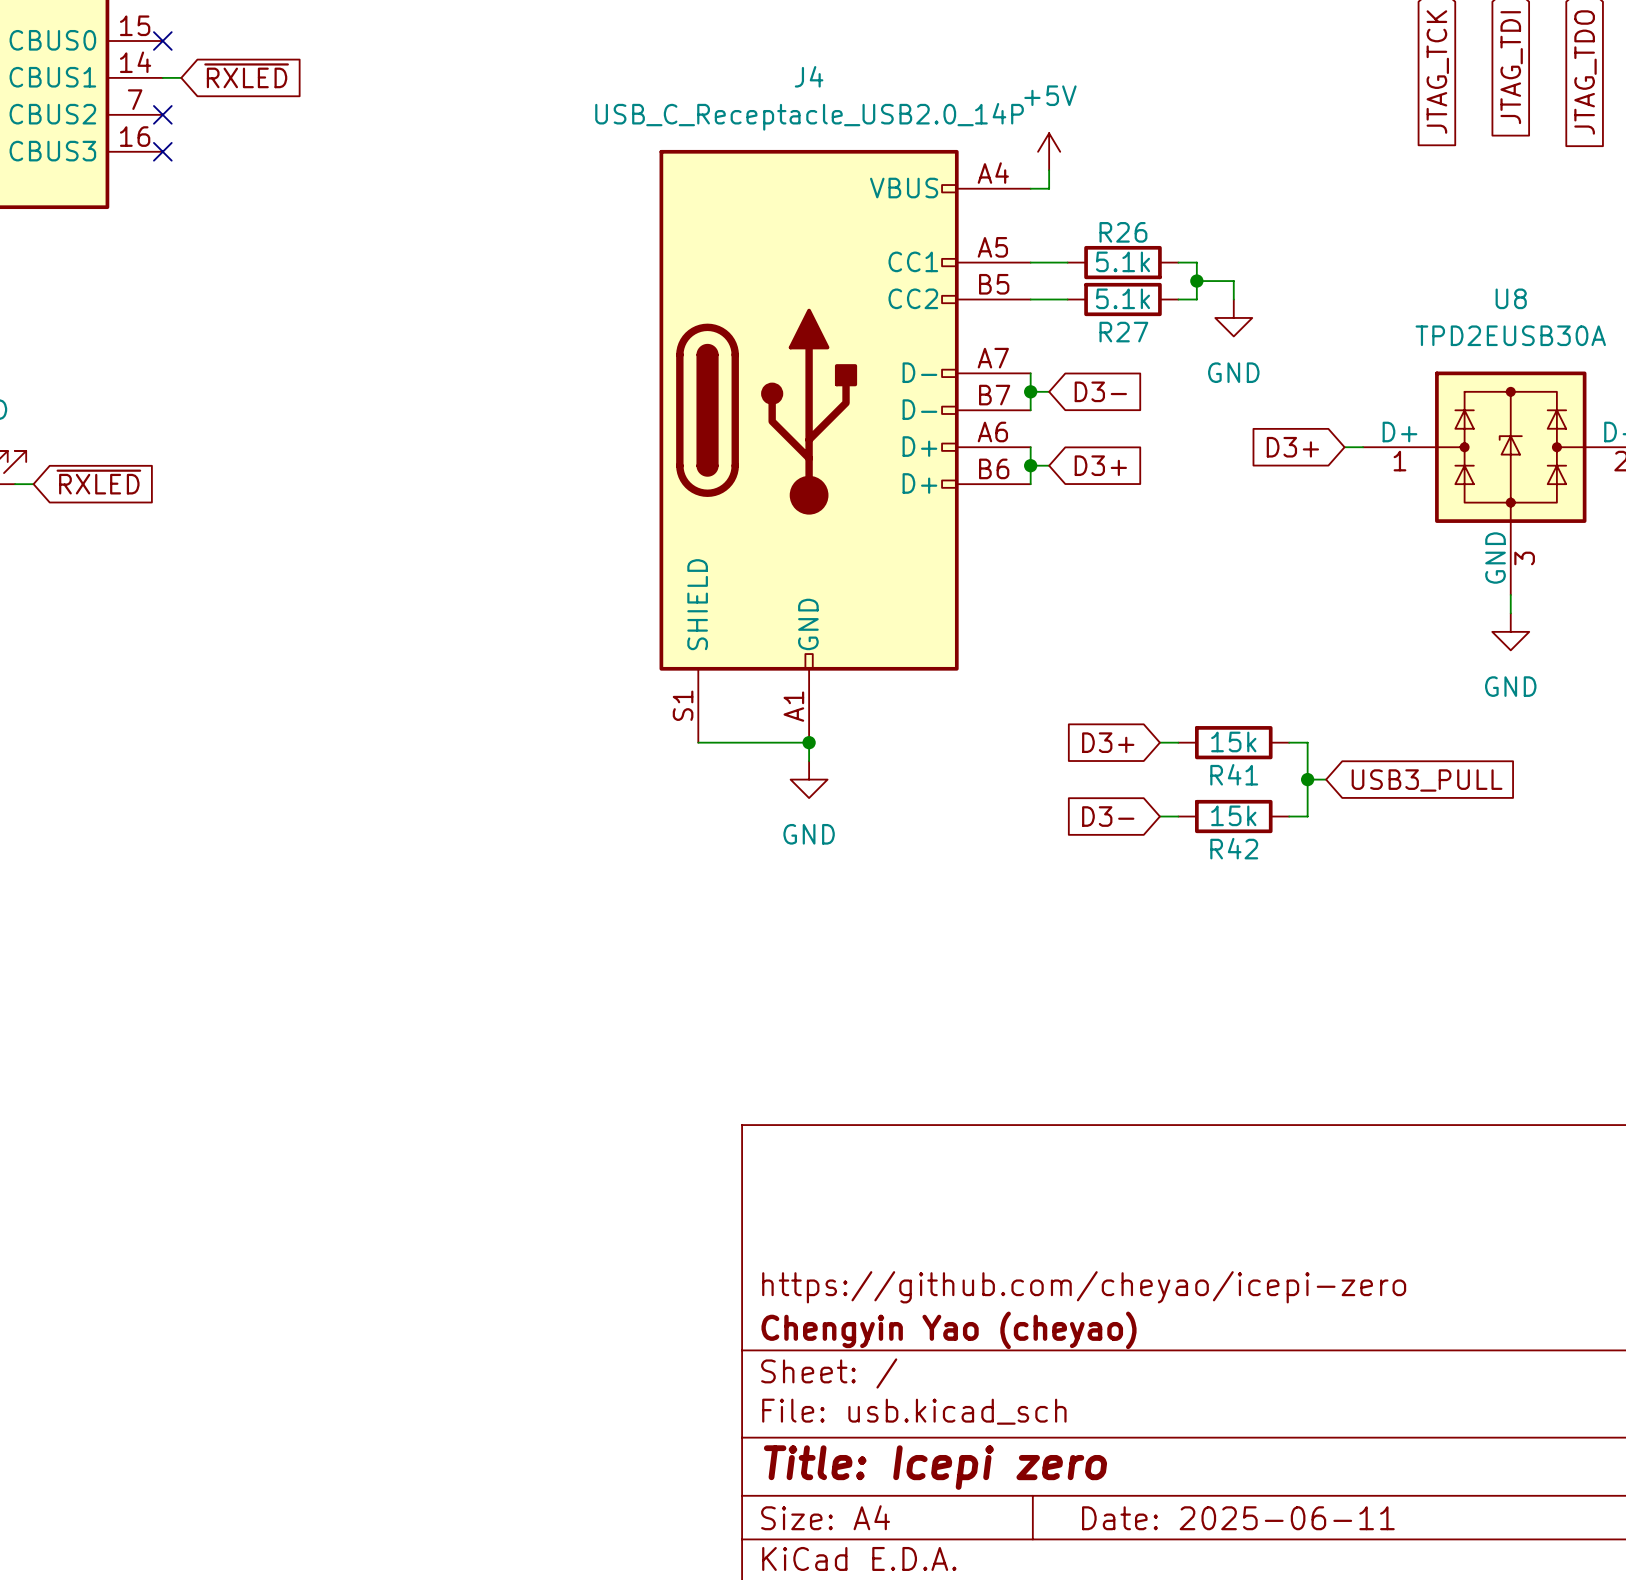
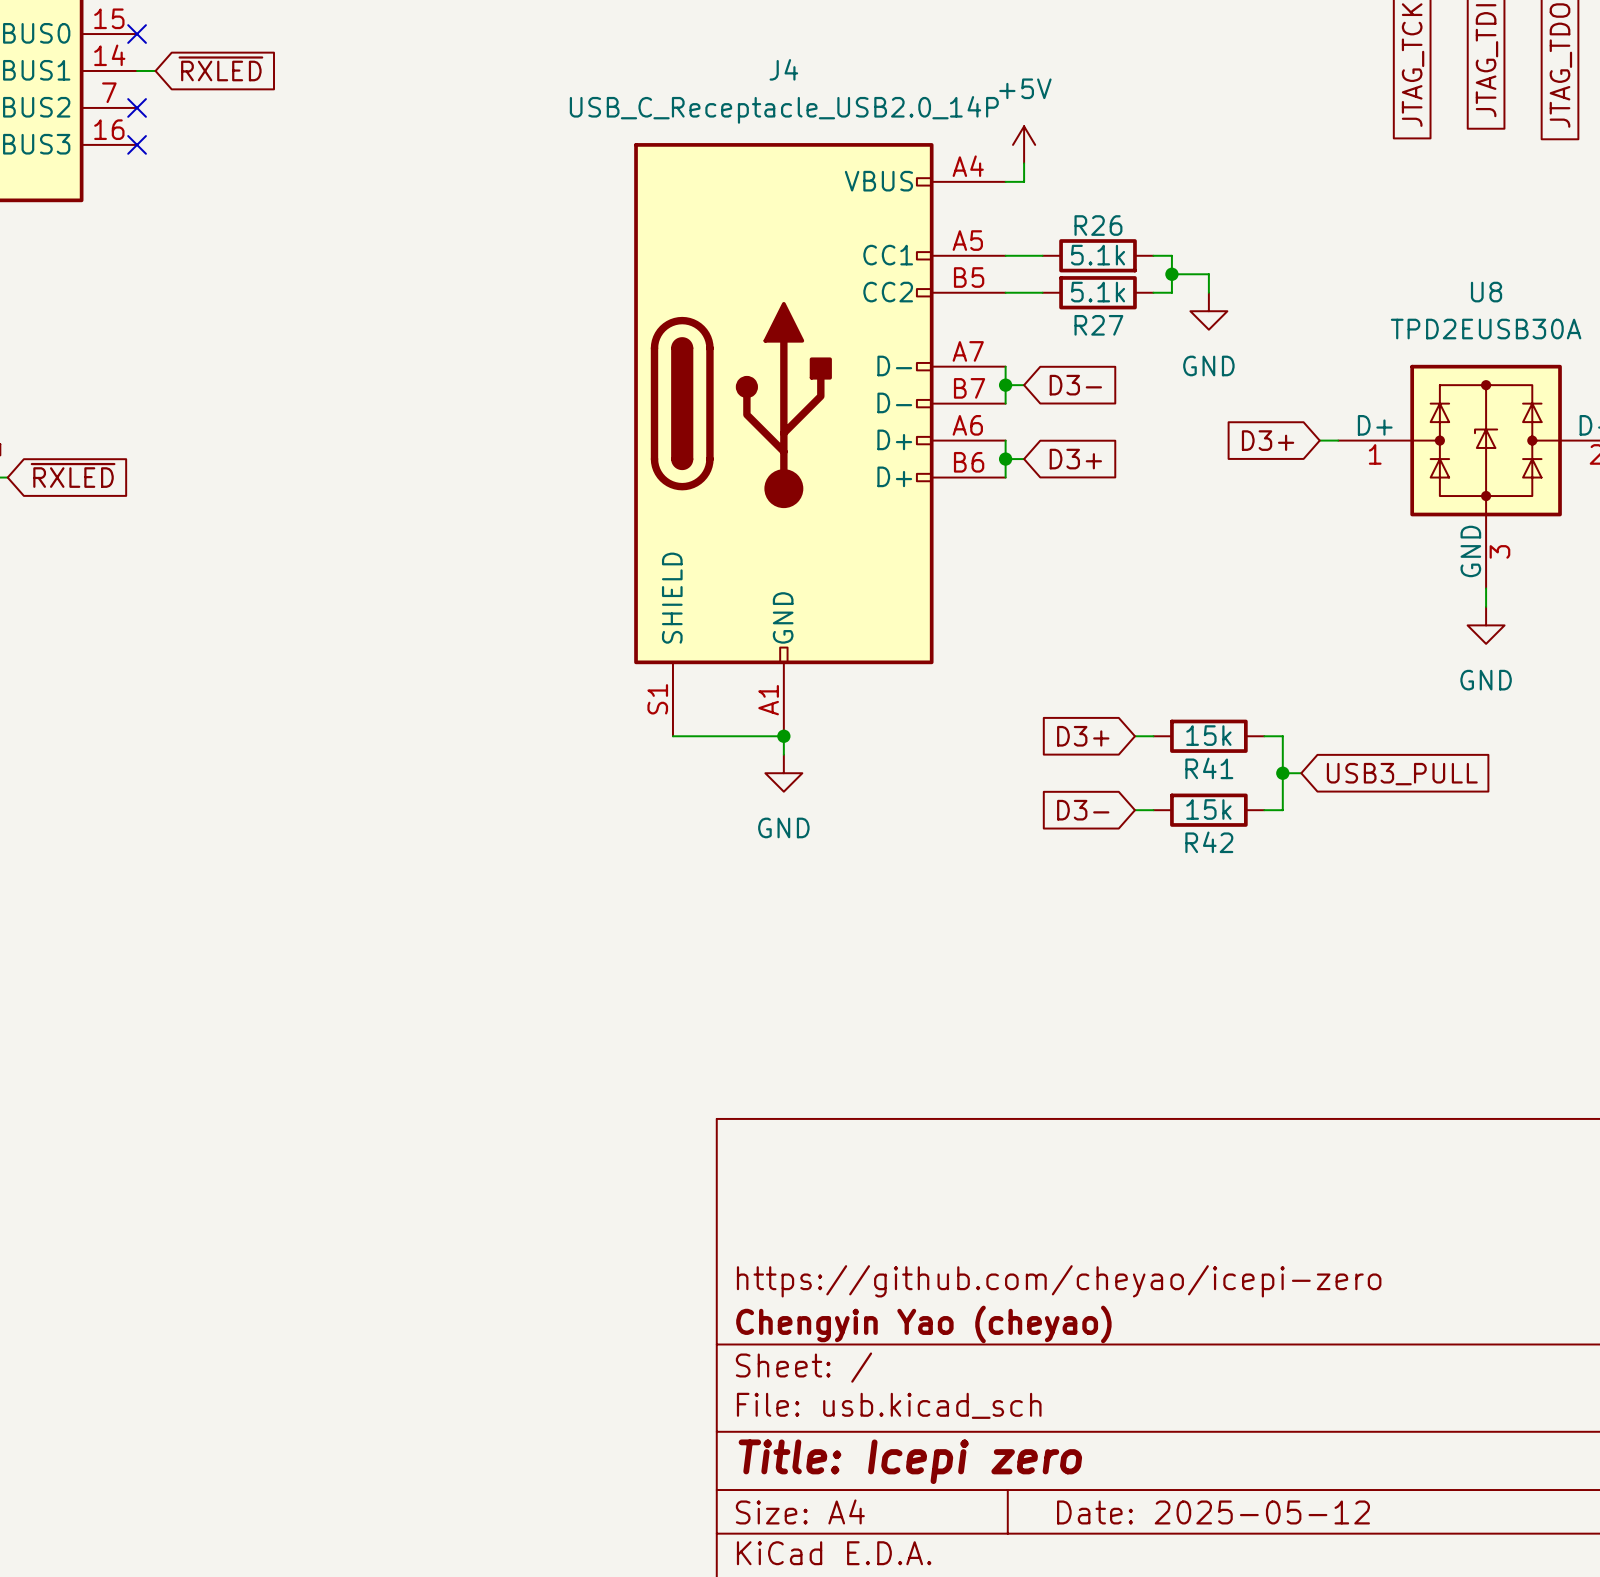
title block: Date: 2025-06-11 (1238, 1518) -> Date: 2025-05-12 (1213, 1512)

